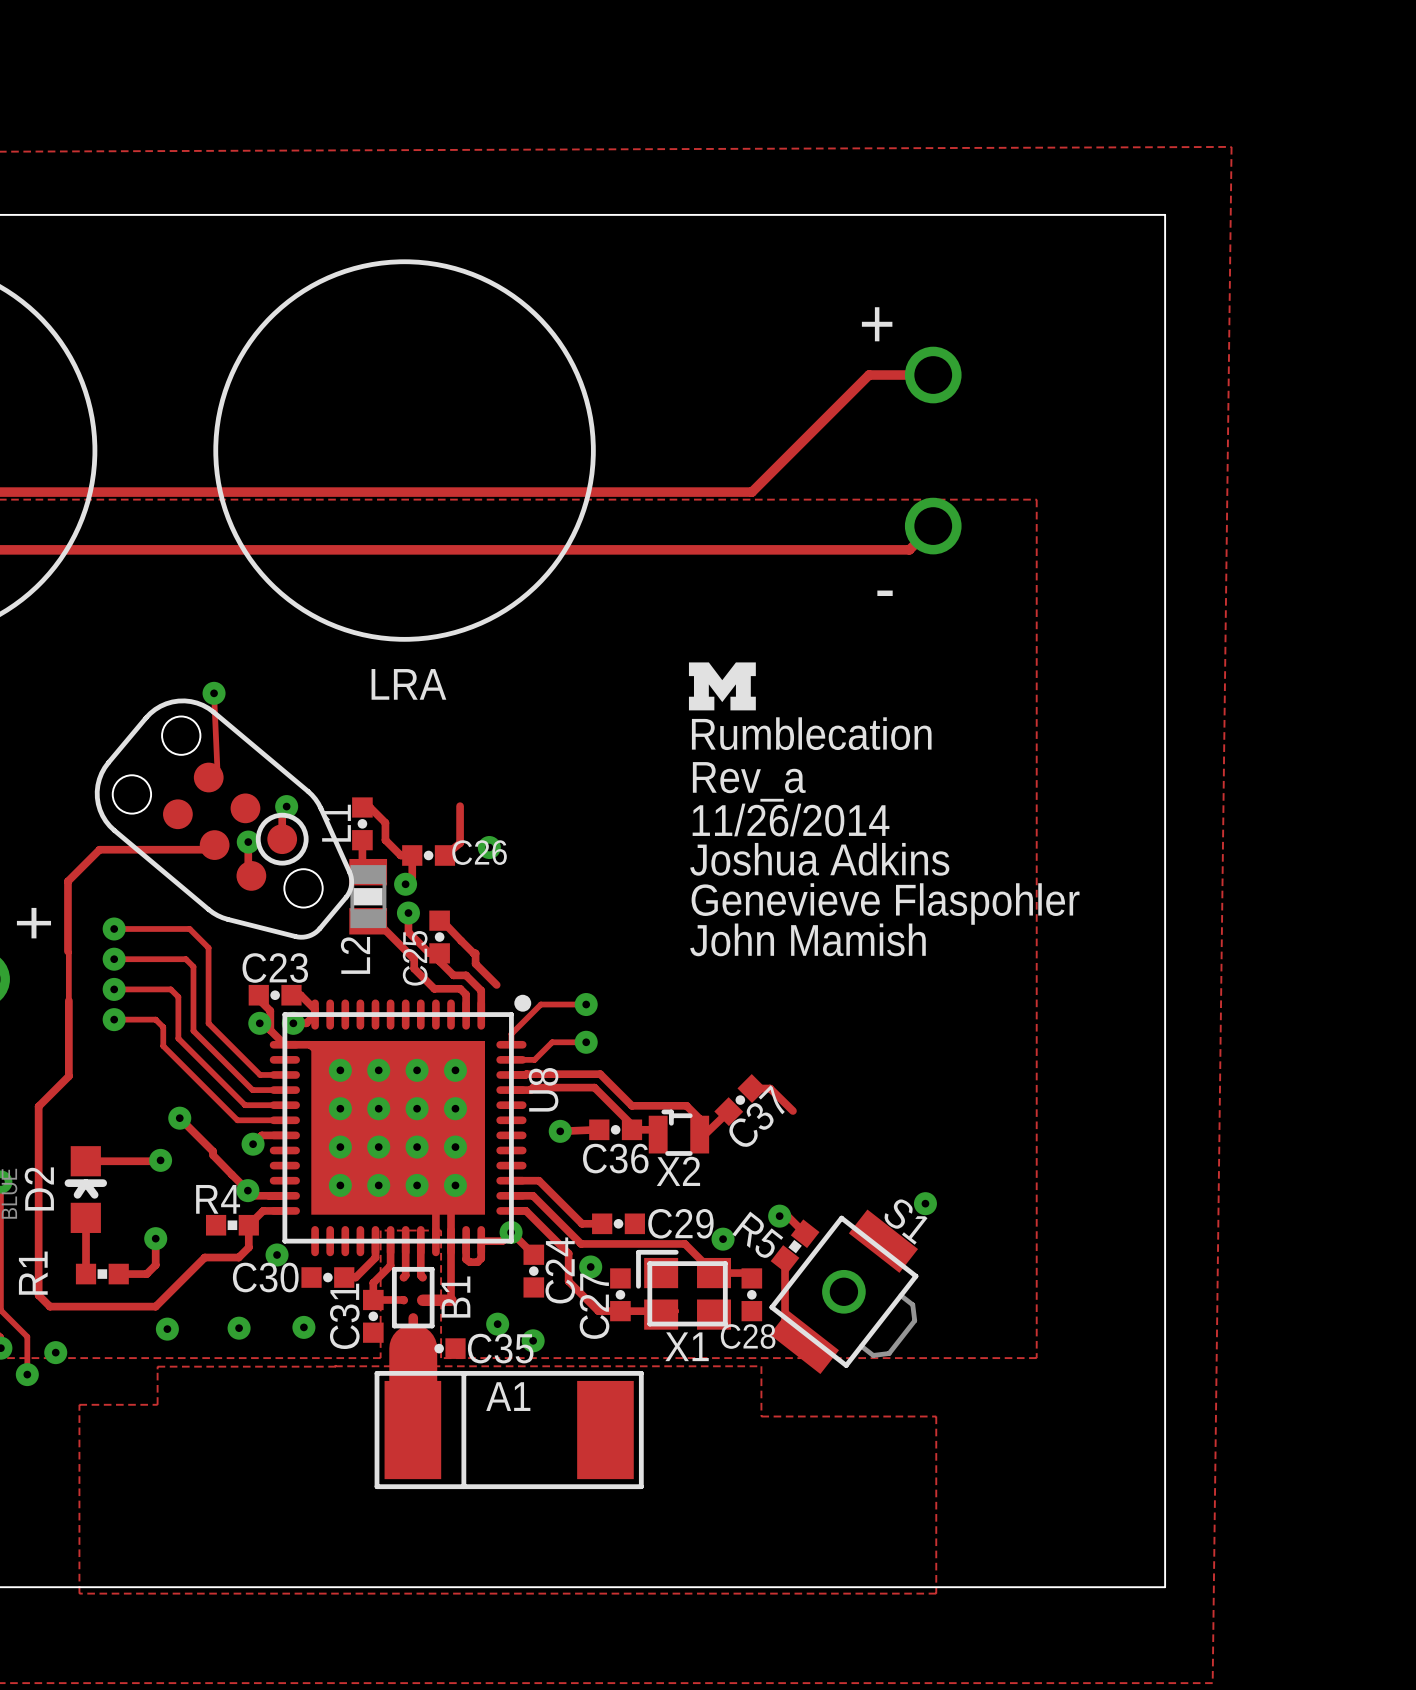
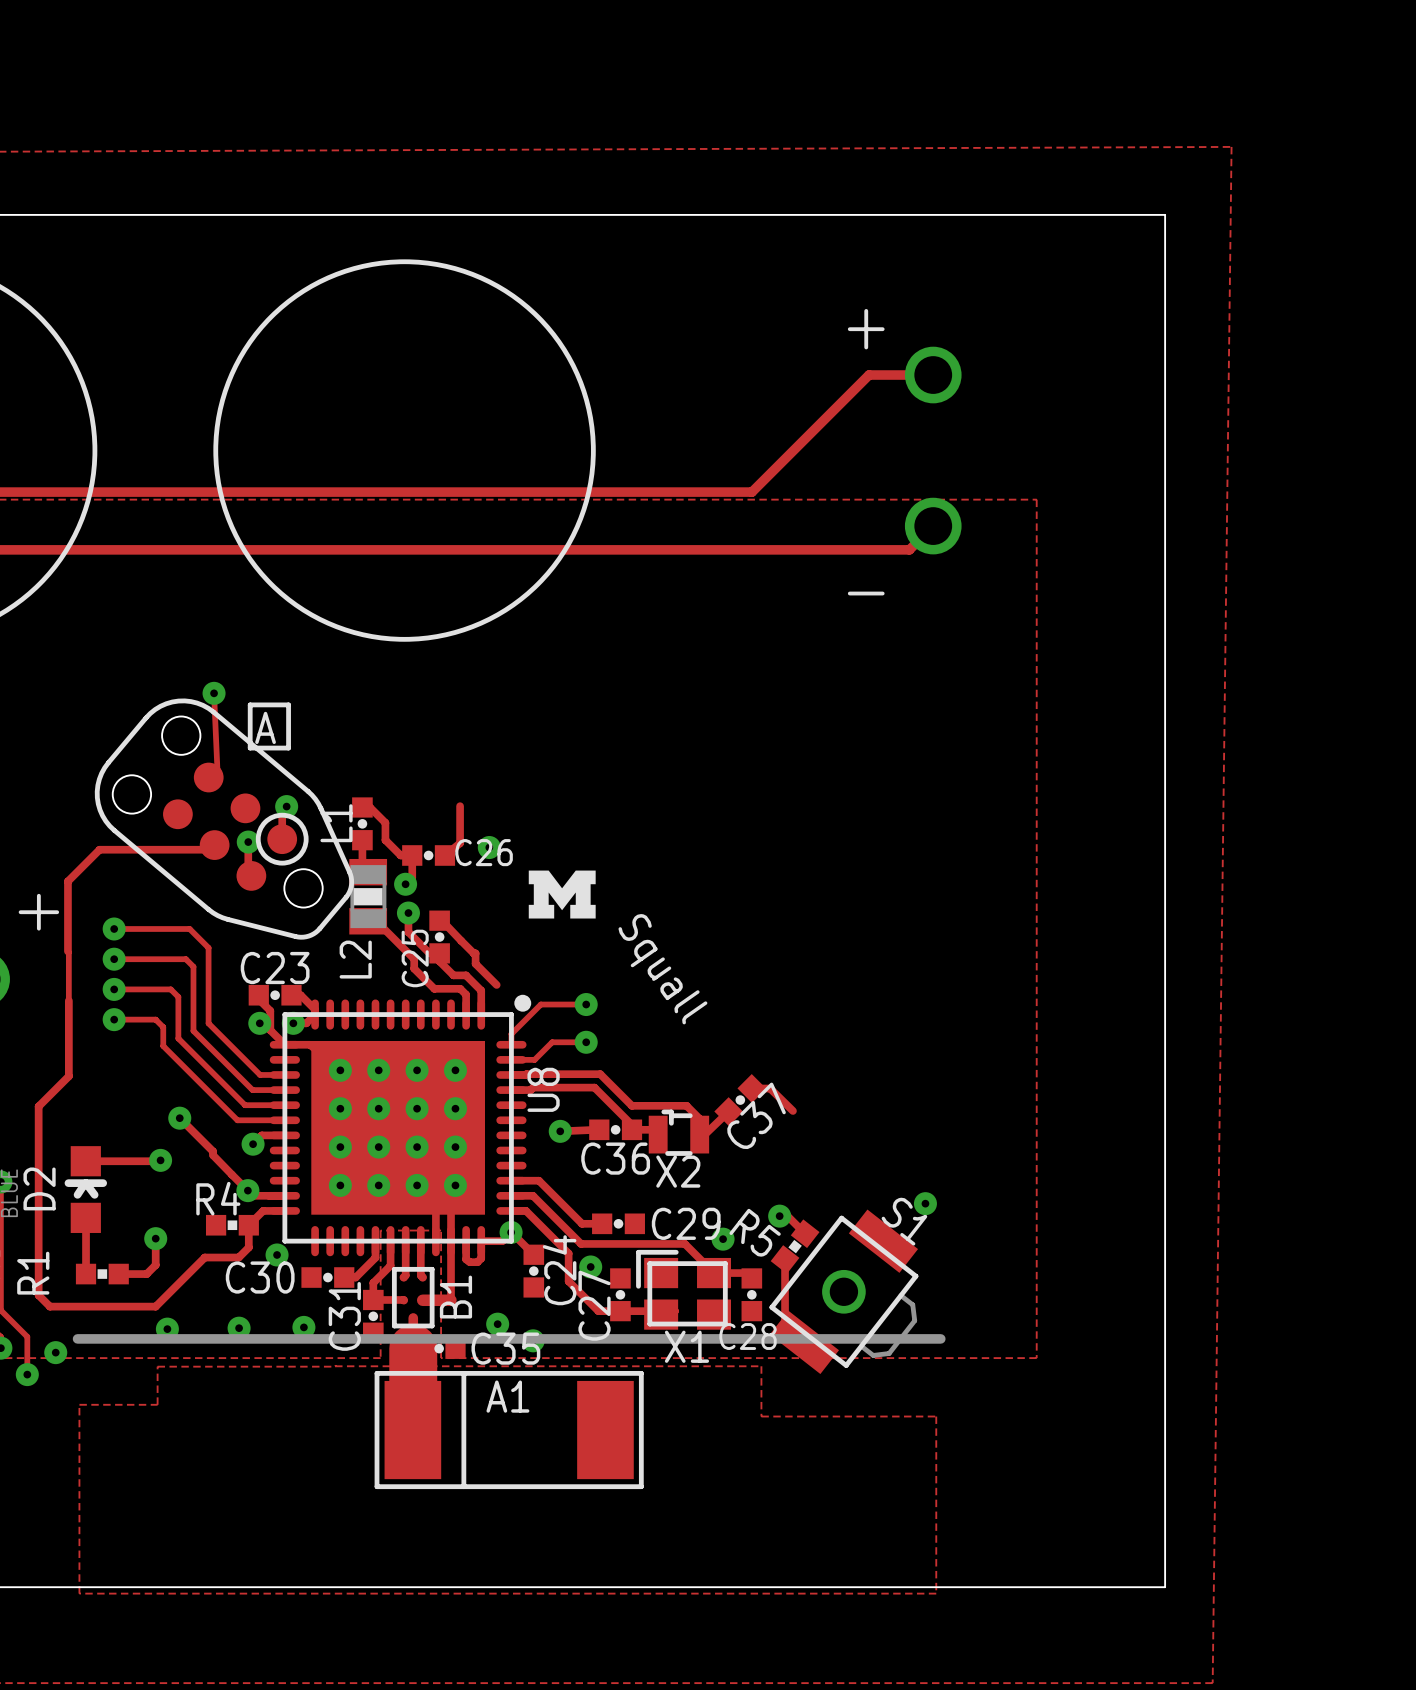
text: LRA (408, 684) -> none
drawing position: (722, 686) -> (562, 894)
line: none -> (250, 704) (288, 704) (288, 748) (250, 748) (250, 704)
text: none -> A (265, 727)
text: Rumblecation (811, 733) -> none
text: Rev_a (749, 781) -> none
text: 11/26/2014 (791, 819) -> none
text: Joshua Adkins (819, 859) -> none
text: Genevieve Flaspohler (885, 904) -> none
text: John Mamish (807, 939) -> none
text: none -> Squall (662, 969)
line: none -> (77, 1338) (940, 1338)

